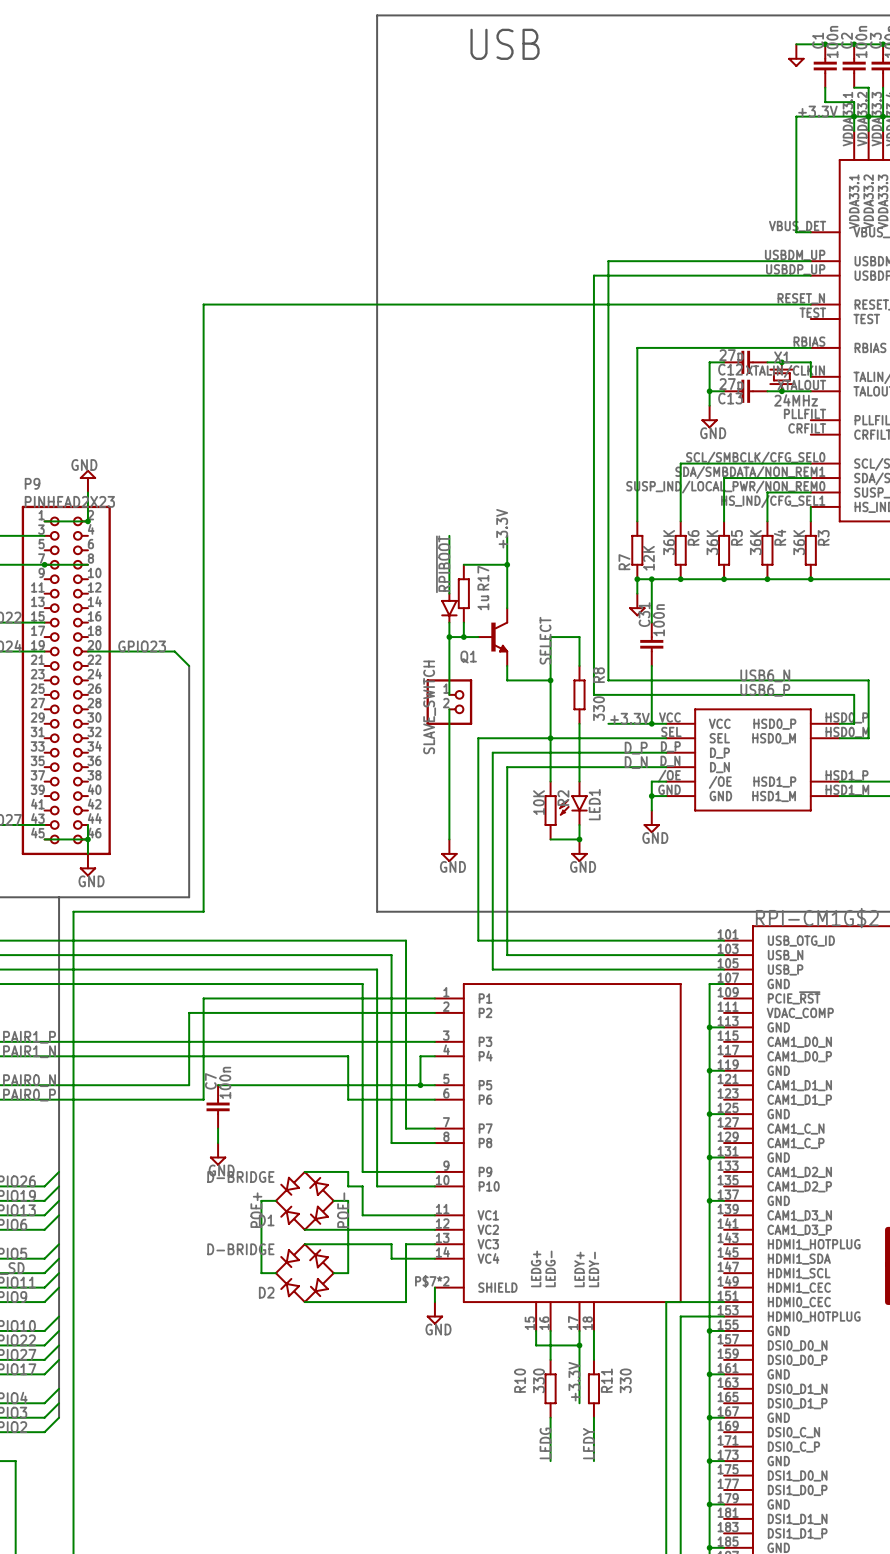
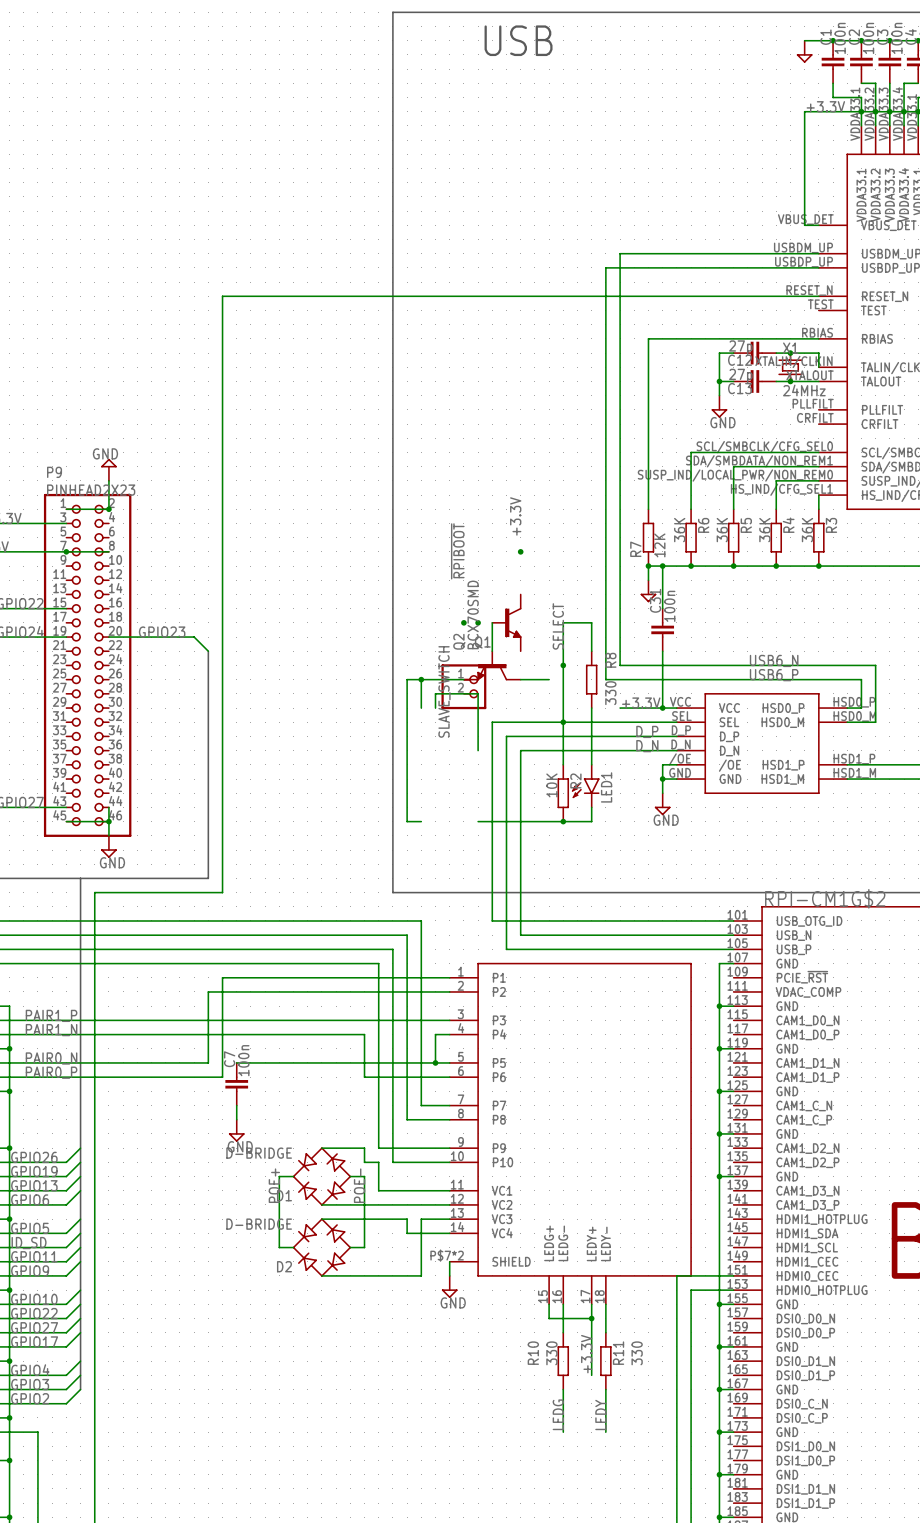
wire: (449, 535) (449, 593) -> none
wire: (507, 535) (507, 608) -> none
wire: (463, 564) (507, 564) -> none
R17: 1u (463, 593) -> none
part: (449, 608) -> none
wire: (449, 622) (449, 694) -> (421, 821) (407, 821) (407, 679) (463, 679)
wire: (463, 622) (463, 637) -> none
wire: (449, 637) (478, 637) -> (492, 651) (492, 622)
wire: (507, 665) (507, 680) (550, 680) -> none
Q2: none -> BCX70SMD (492, 665)
wire: none -> (421, 679) (421, 708)
junction: none -> (421, 679)
wire: none -> (520, 679) (549, 679)
wire: (449, 709) (449, 839) -> none
wire: none -> (435, 708) (435, 693) (478, 693) (478, 750)
wire: none -> (478, 821) (563, 821)
junction position: (579, 839) -> (563, 821)
power symbol: GND (449, 850) -> none
power symbol: GND (579, 850) -> none

